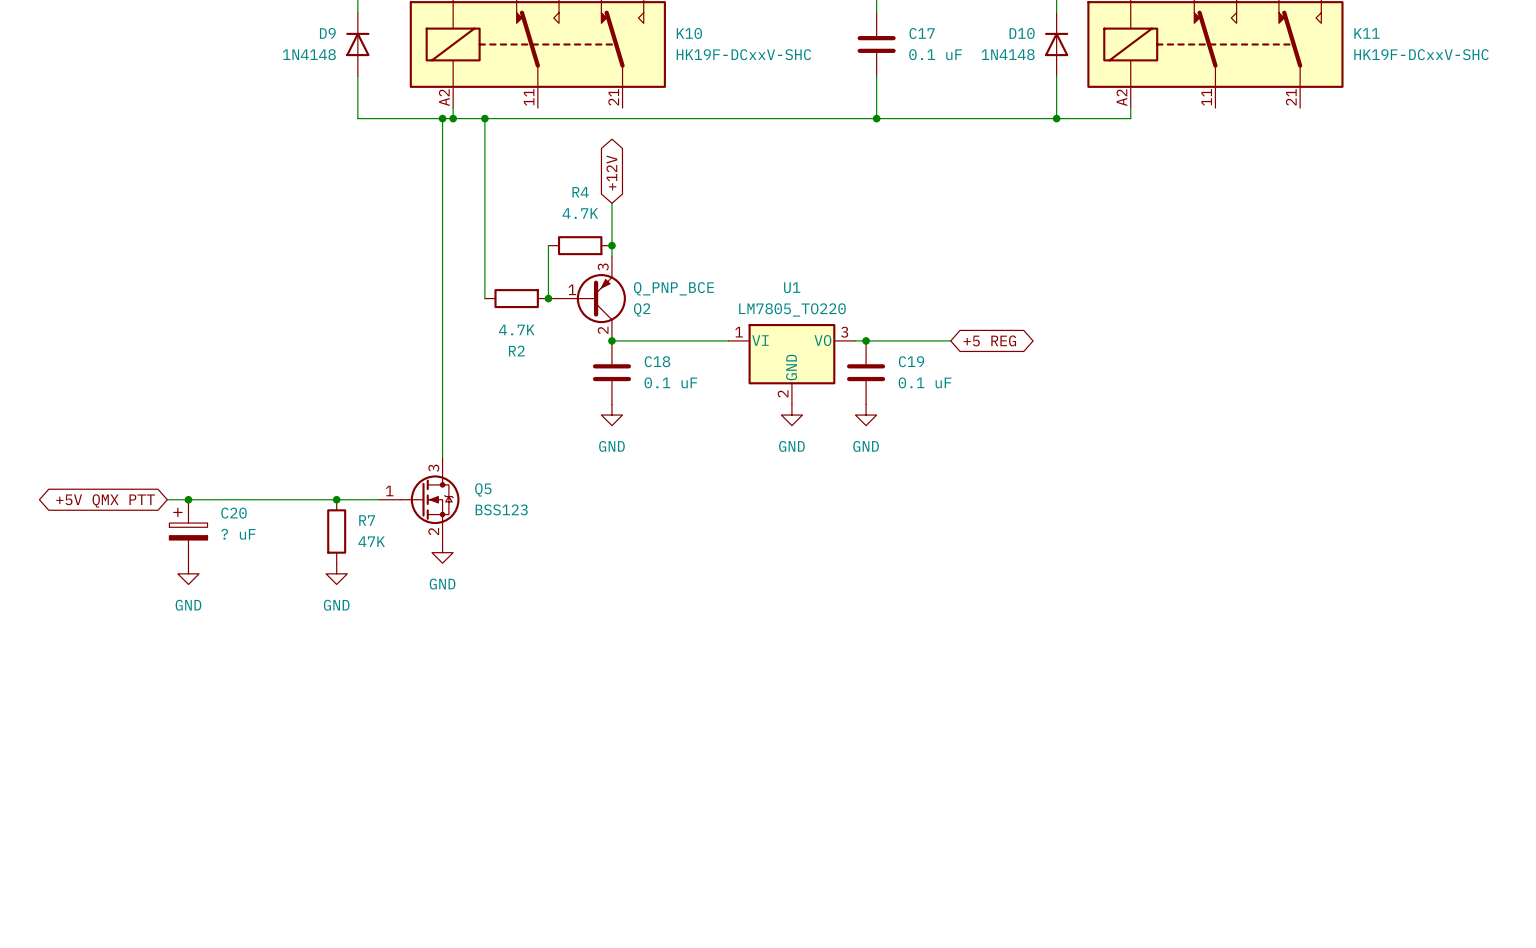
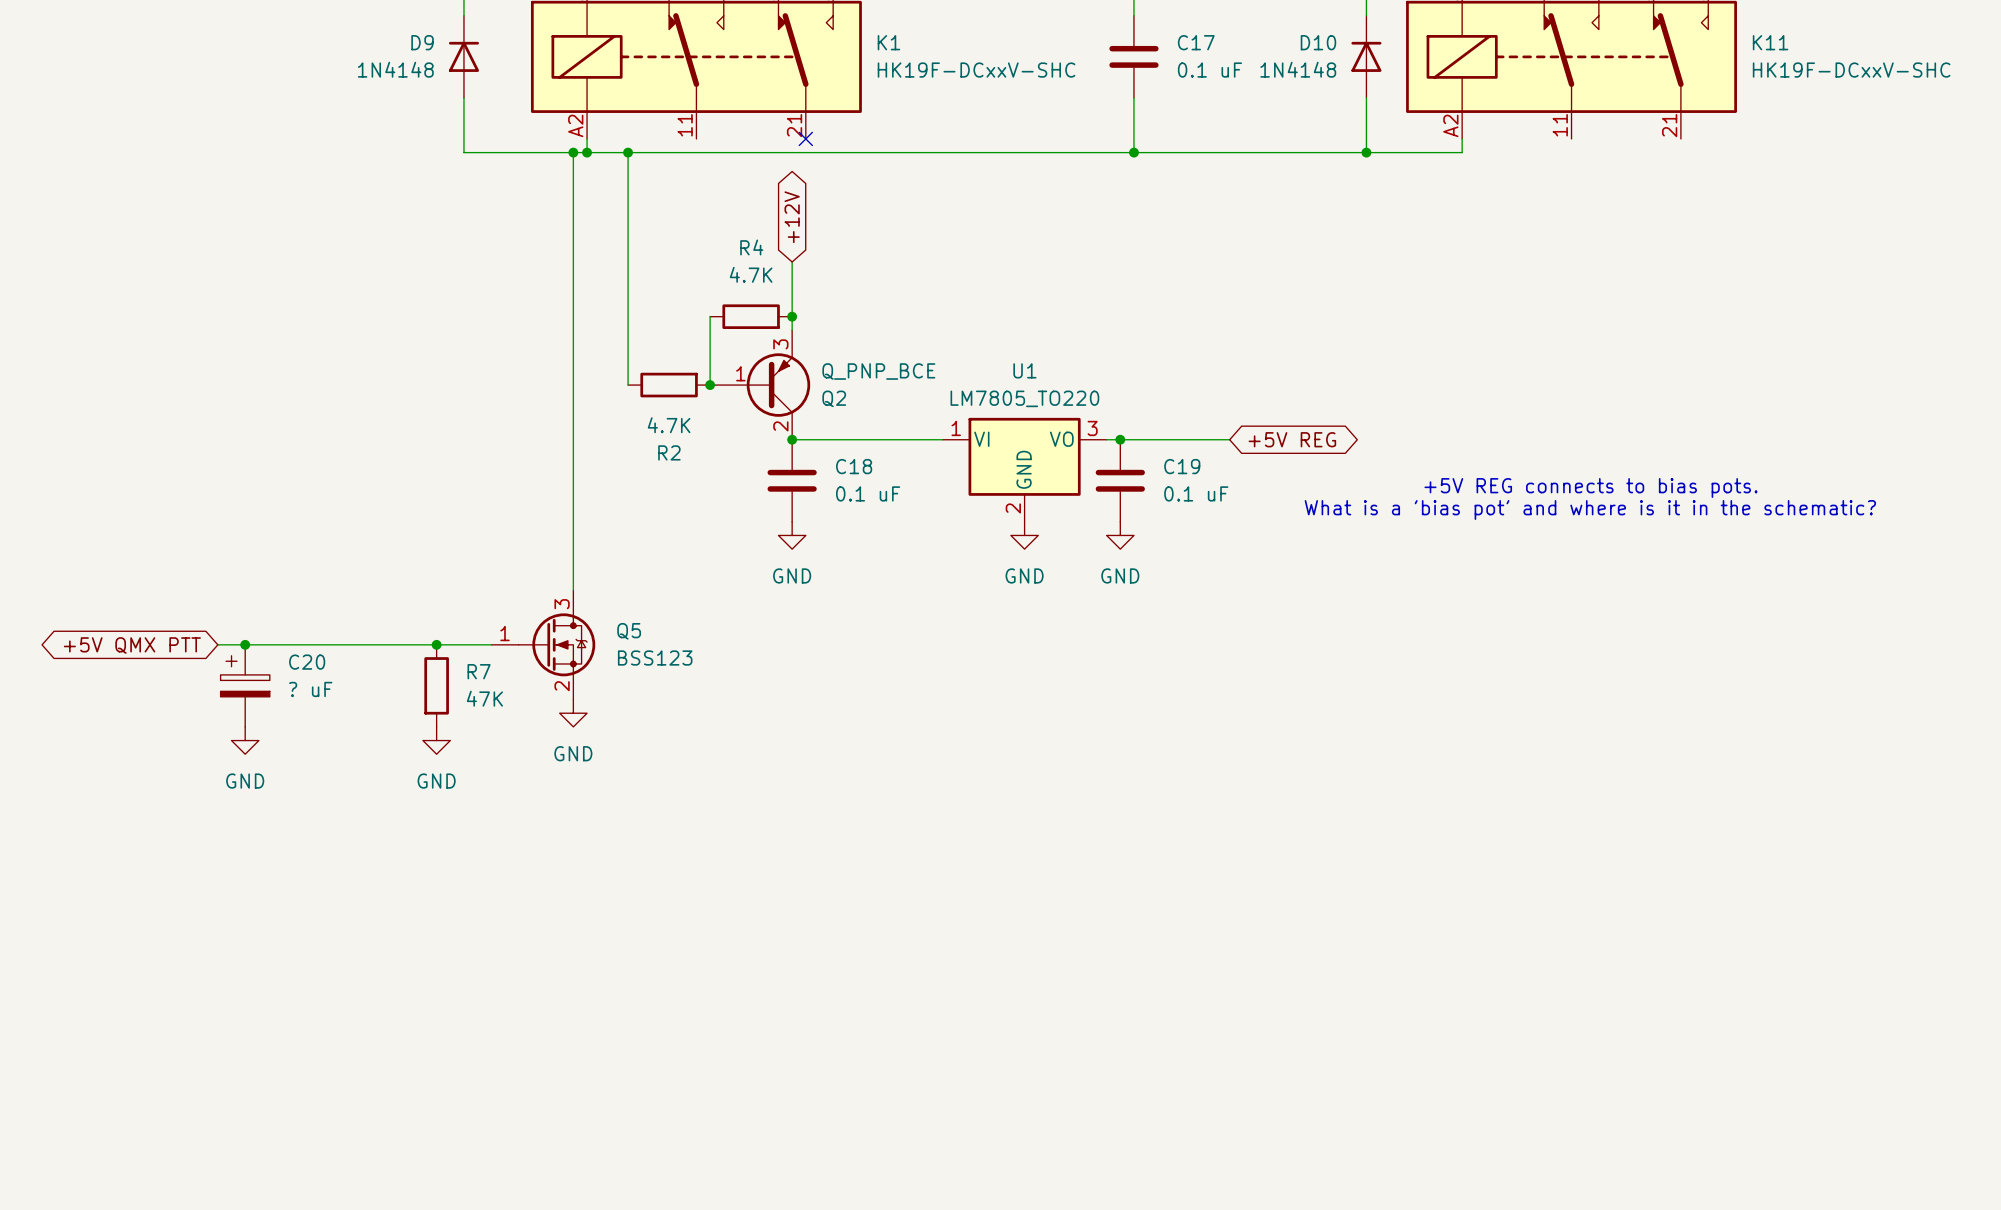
K10 name: K10 (689, 33) -> K1 (888, 42)
no-connect mark: none -> (805, 138)
global label: +5 REG (989, 340) -> +5V REG (1292, 439)
text: none -> +5V REG connects to bias pots. (1590, 487)
text: none -> What is a 'bias pot' and where is it in the schematic? (1590, 509)

